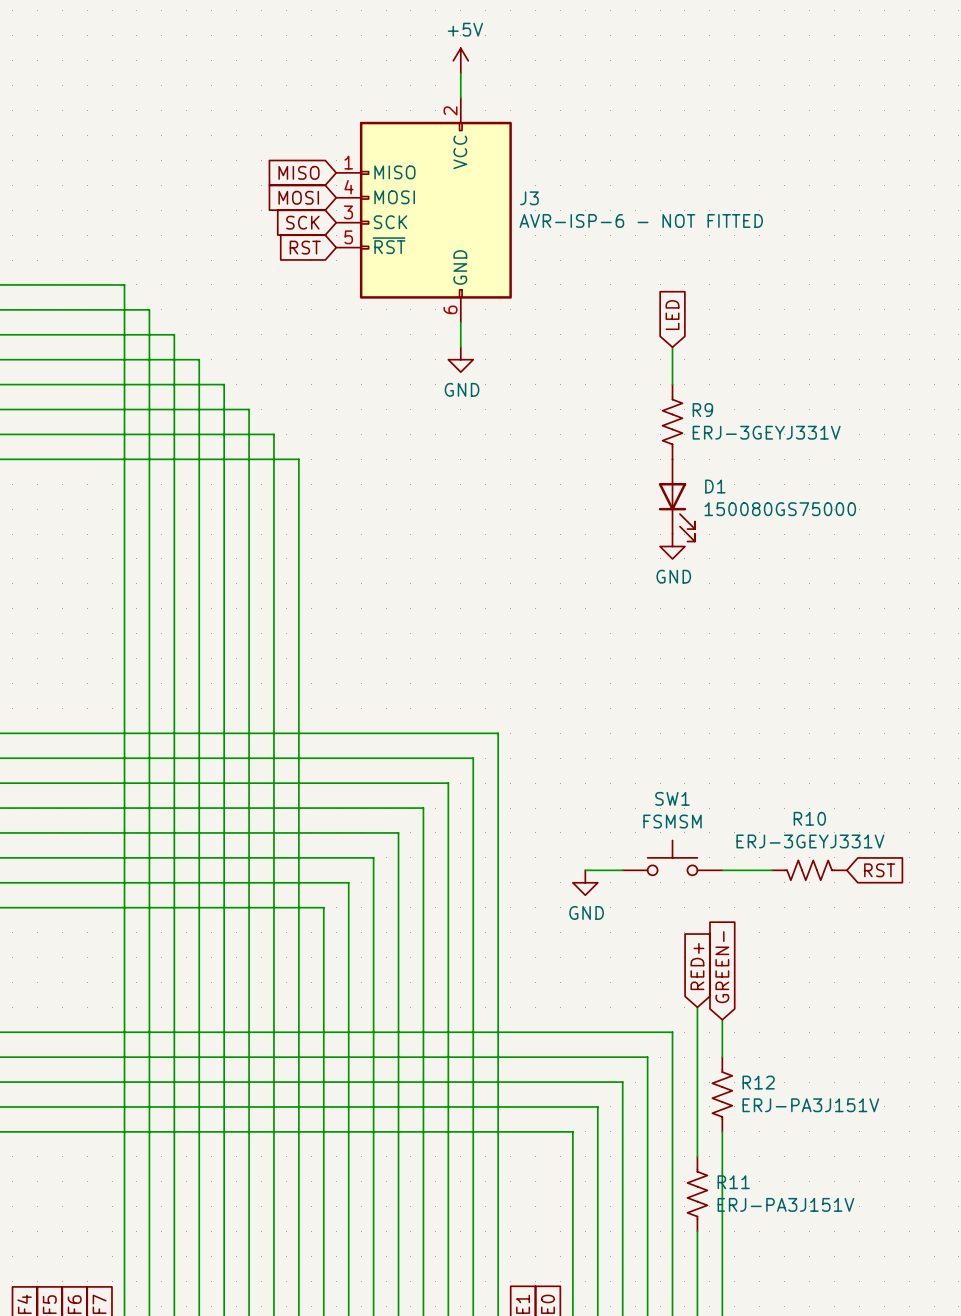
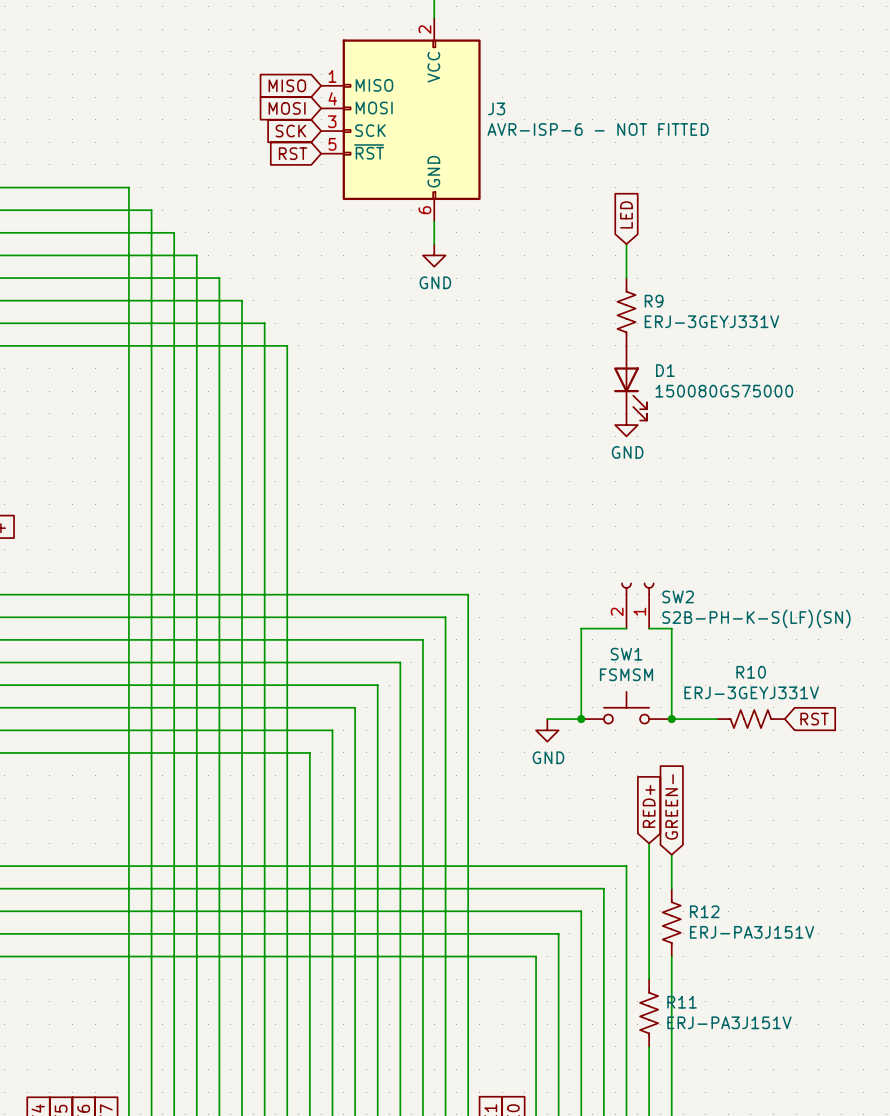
SW2: none -> S2B-PH-K-S(LF)(SN) (637, 605)
wire: none -> (626, 628) (581, 628) (581, 719)
wire: none -> (649, 628) (671, 628) (671, 719)
junction: none -> (581, 719)
junction: none -> (671, 719)

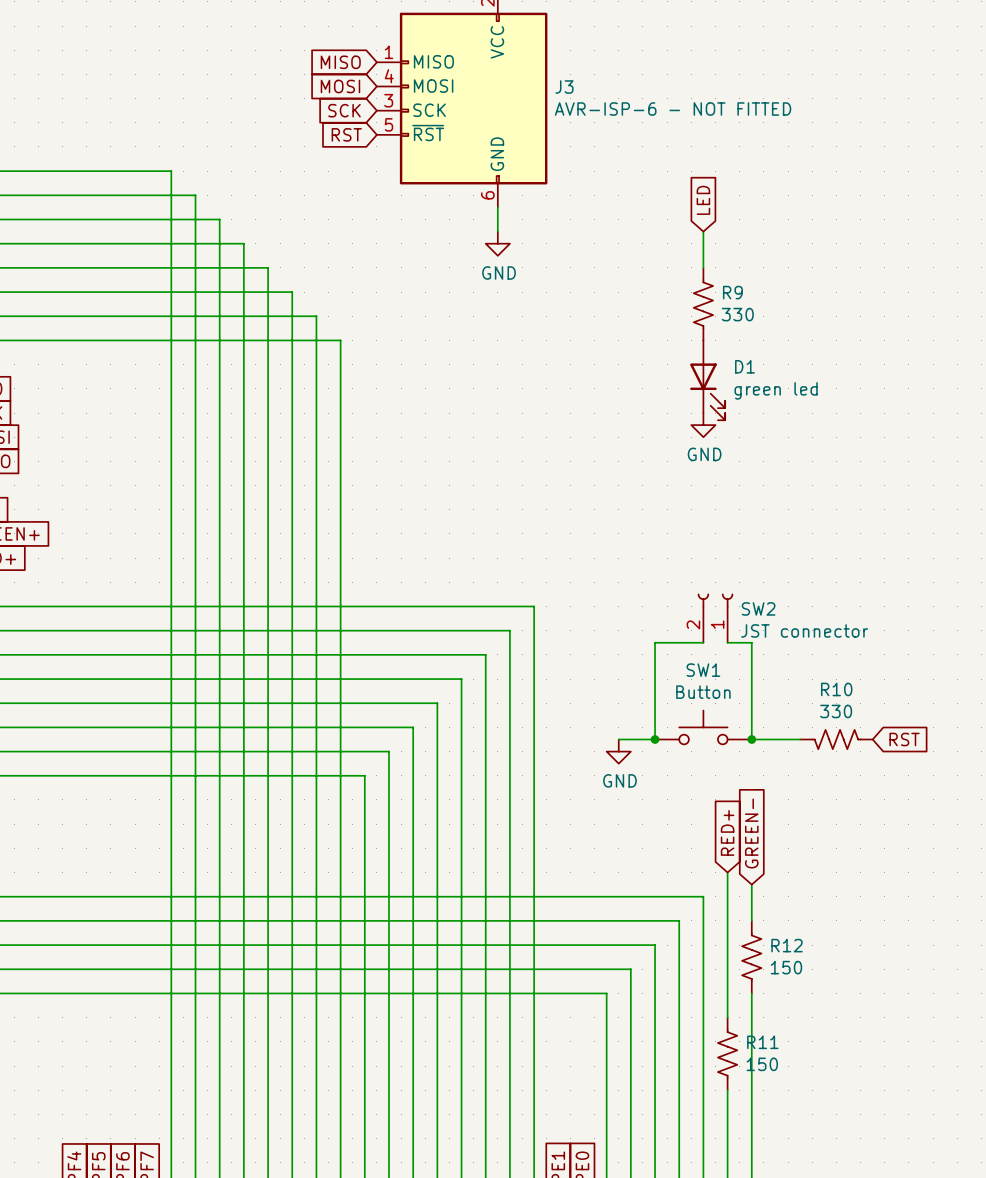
R9 value: ERJ-3GEYJ331V (711, 321) -> 330 (737, 314)
D1 value: 150080GS75000 (724, 391) -> green led (776, 390)
SW2 value: S2B-PH-K-S(LF)(SN) (756, 618) -> JST connector (804, 630)
SW1 value: FSMSM (626, 674) -> Button (703, 692)
R10 value: ERJ-3GEYJ331V (751, 692) -> 330 (836, 711)
R12 value: ERJ-PA3J151V (752, 932) -> 150 (786, 967)
R11 value: ERJ-PA3J151V (729, 1022) -> 150 (762, 1064)

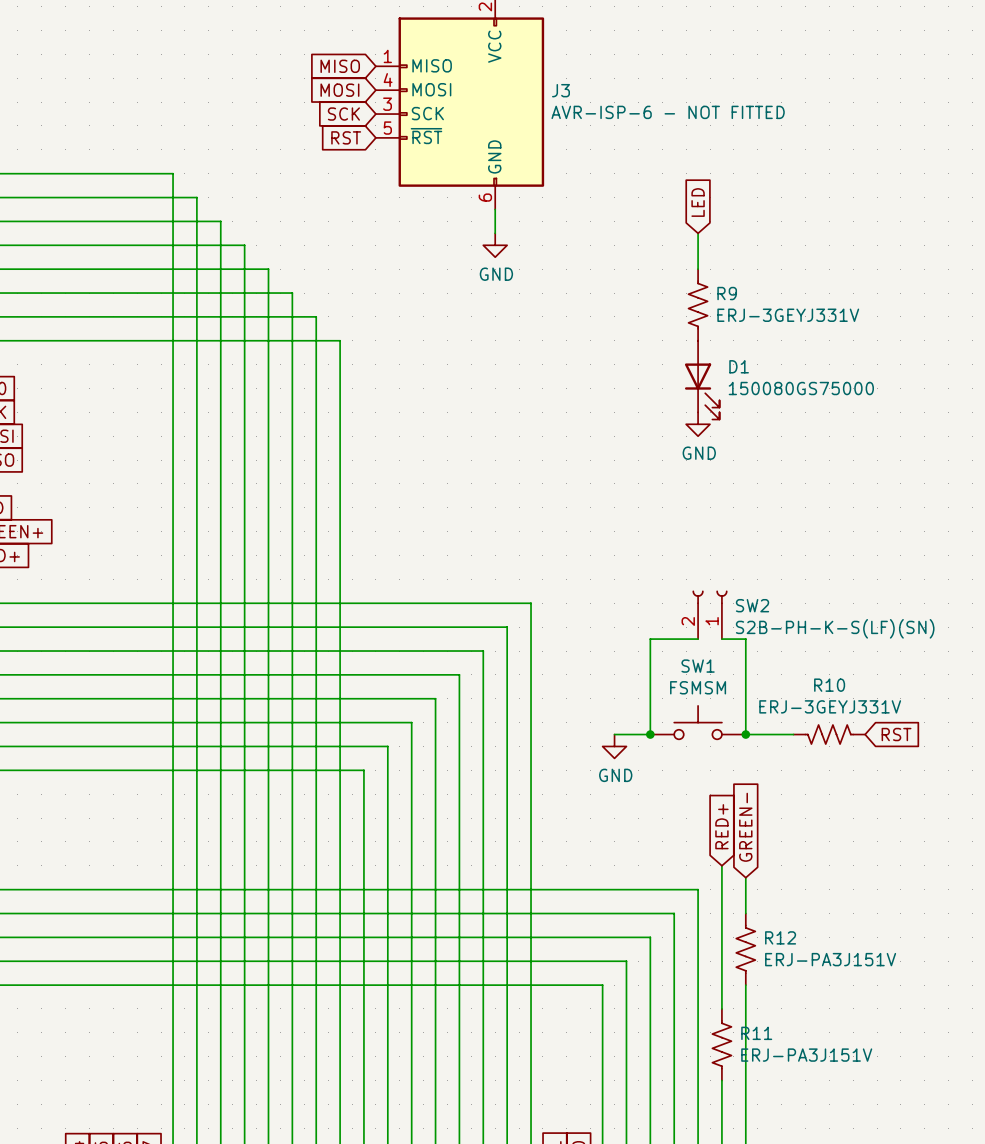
R9 value: 330 (737, 314) -> ERJ-3GEYJ331V (788, 315)
D1 value: green led (776, 390) -> 150080GS75000 (801, 388)
SW2 value: JST connector (804, 630) -> S2B-PH-K-S(LF)(SN) (835, 628)
SW1 value: Button (703, 692) -> FSMSM (698, 687)
R10 value: 330 (836, 711) -> ERJ-3GEYJ331V (830, 706)
R12 value: 150 (786, 967) -> ERJ-PA3J151V (830, 959)
R11 value: 150 (762, 1064) -> ERJ-PA3J151V (806, 1055)

